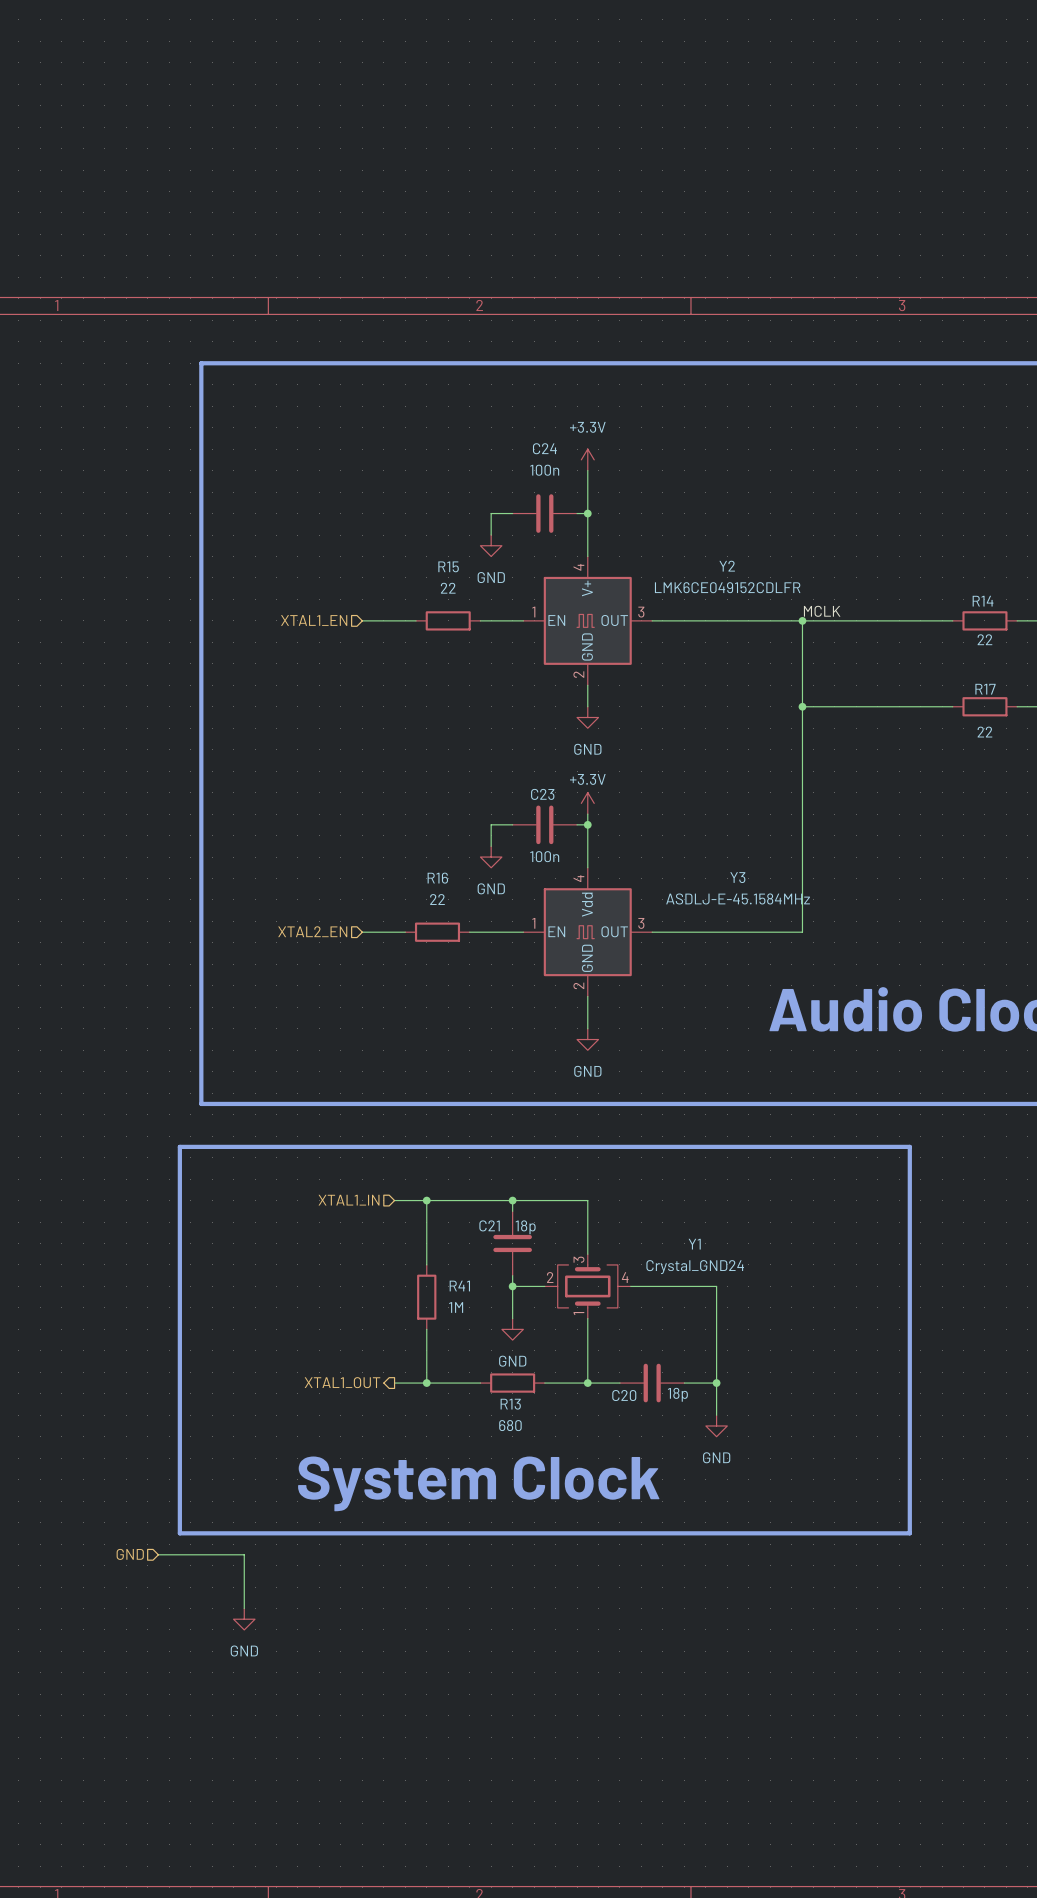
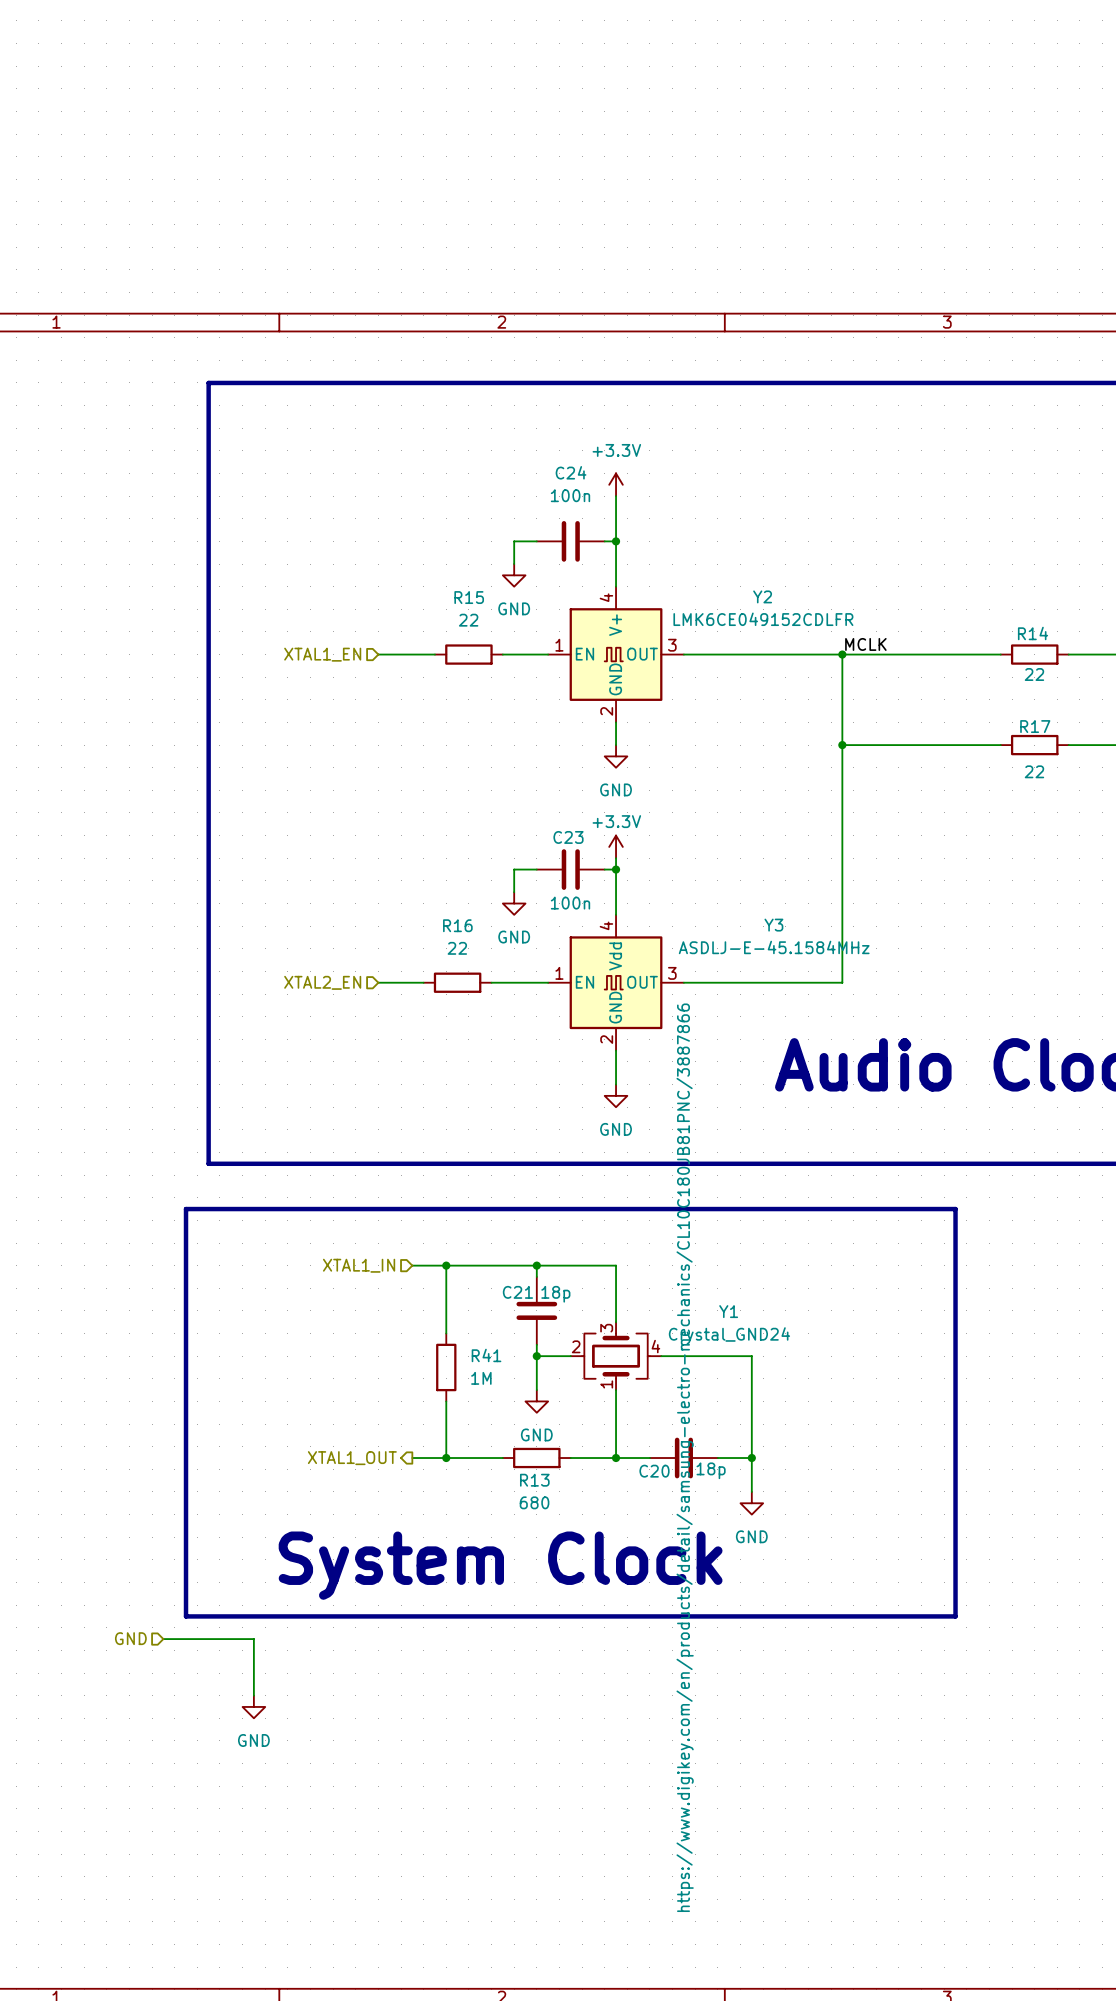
C20 text: none -> https://www.digikey.com/en/products/detail/samsung-electro-mechanics/CL10C180JB81PNC/3887866 (685, 1457)

